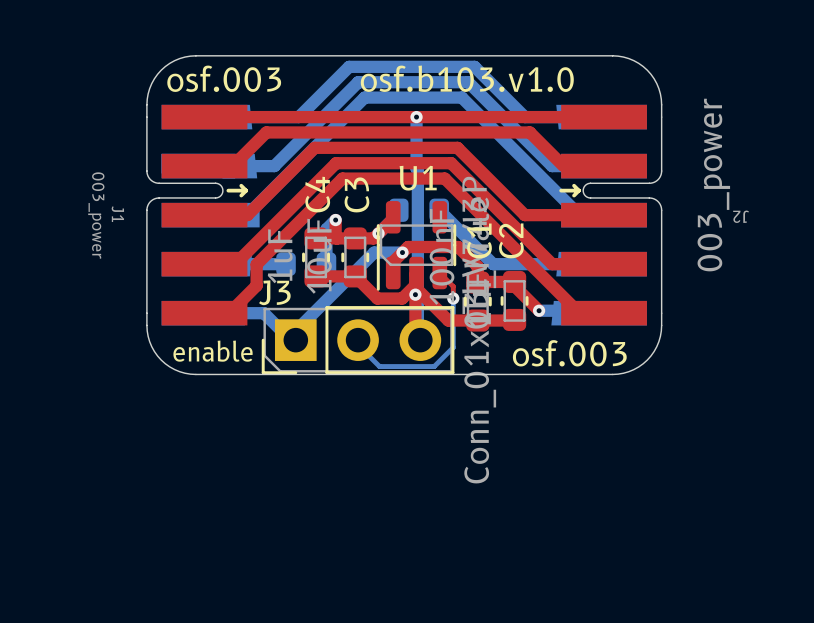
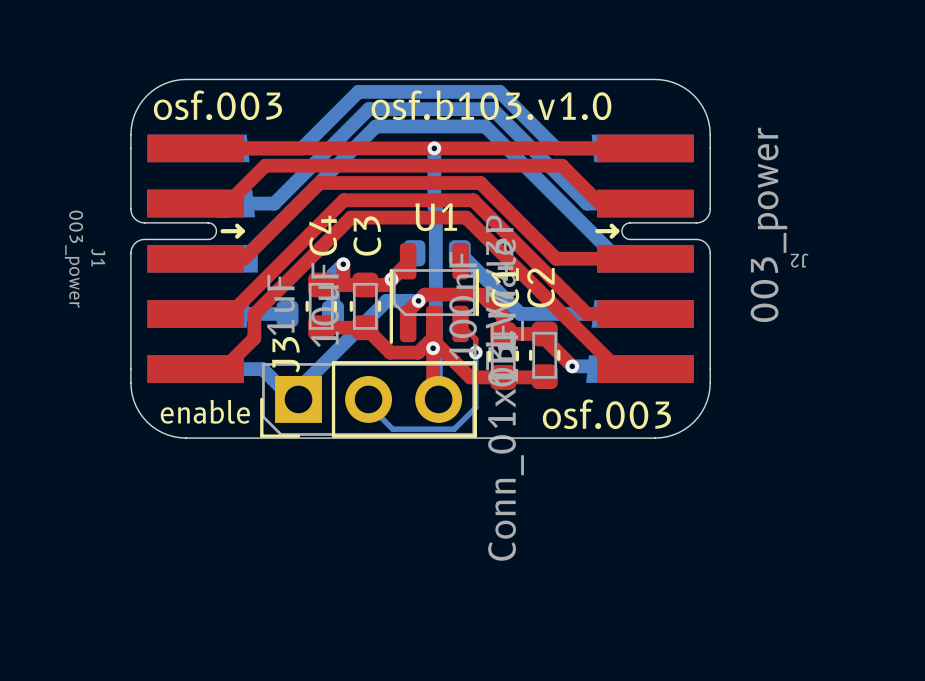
J3 name rotation: 0° (274, 292) -> 90° counterclockwise (286, 354)

